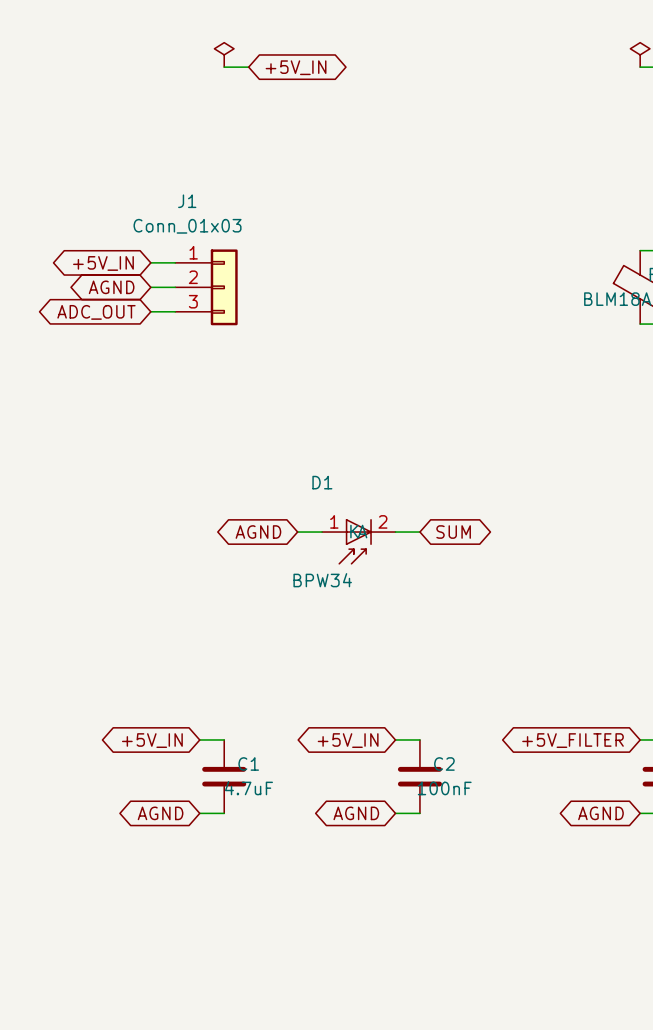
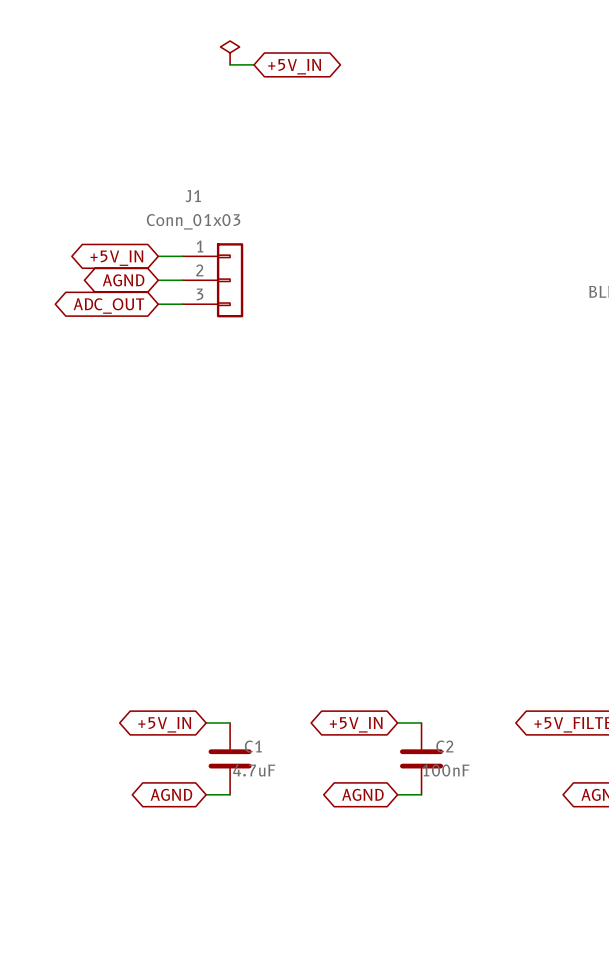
global label: AGND (258, 532) -> none
wire: (297, 532) (322, 532) -> none
wire: (395, 532) (419, 532) -> none
global label: SUM (453, 532) -> none
D1: BPW34 (358, 541) -> none

